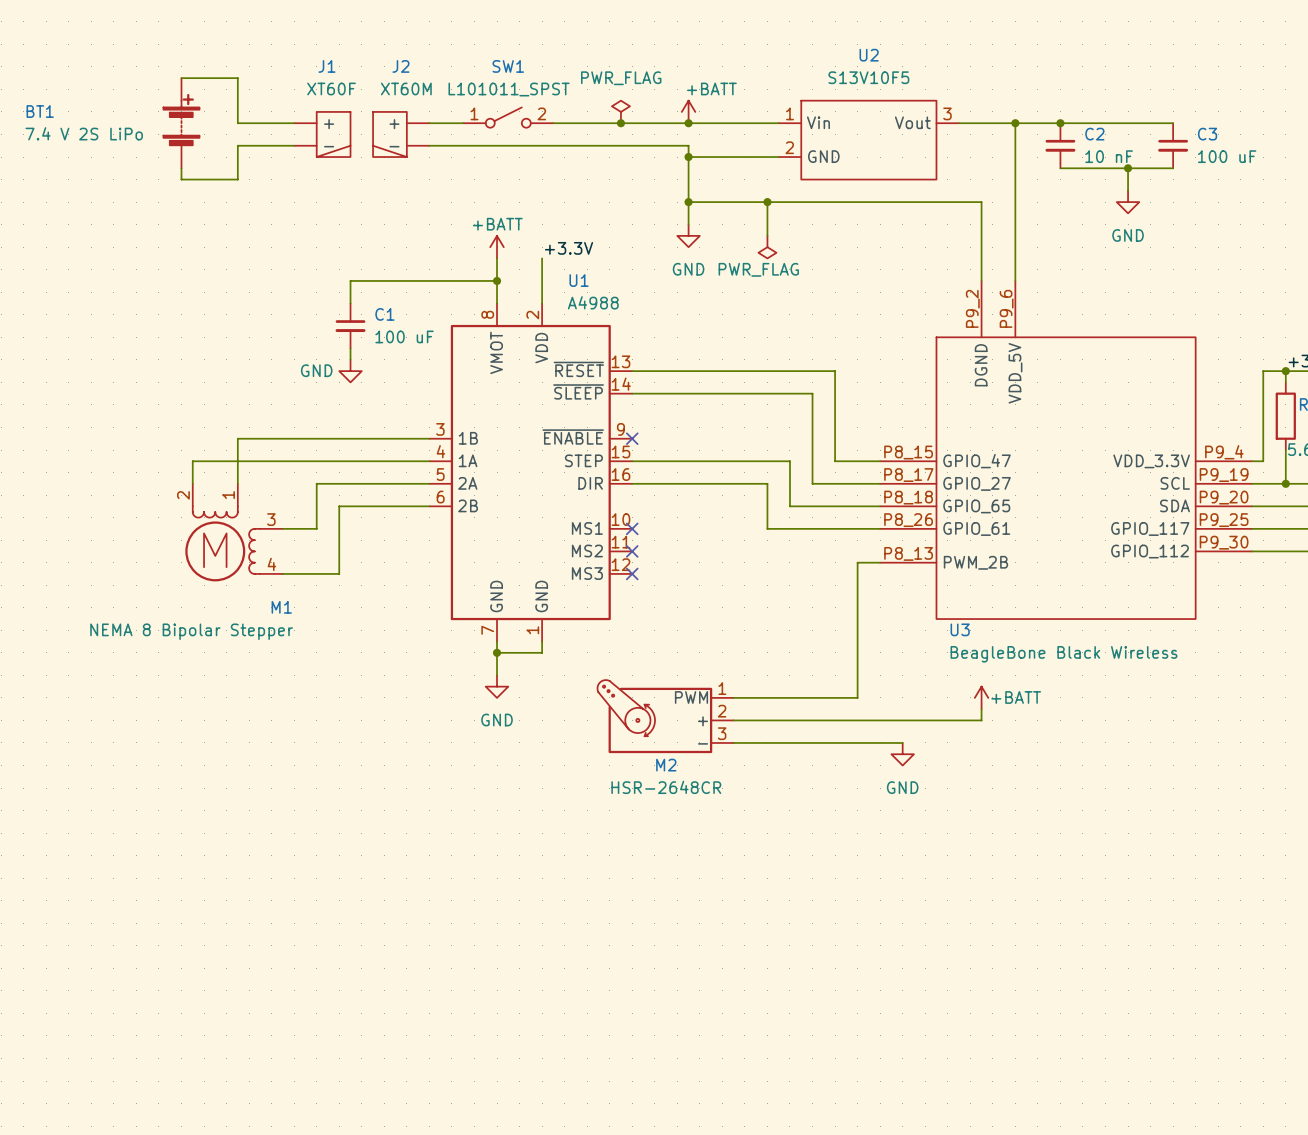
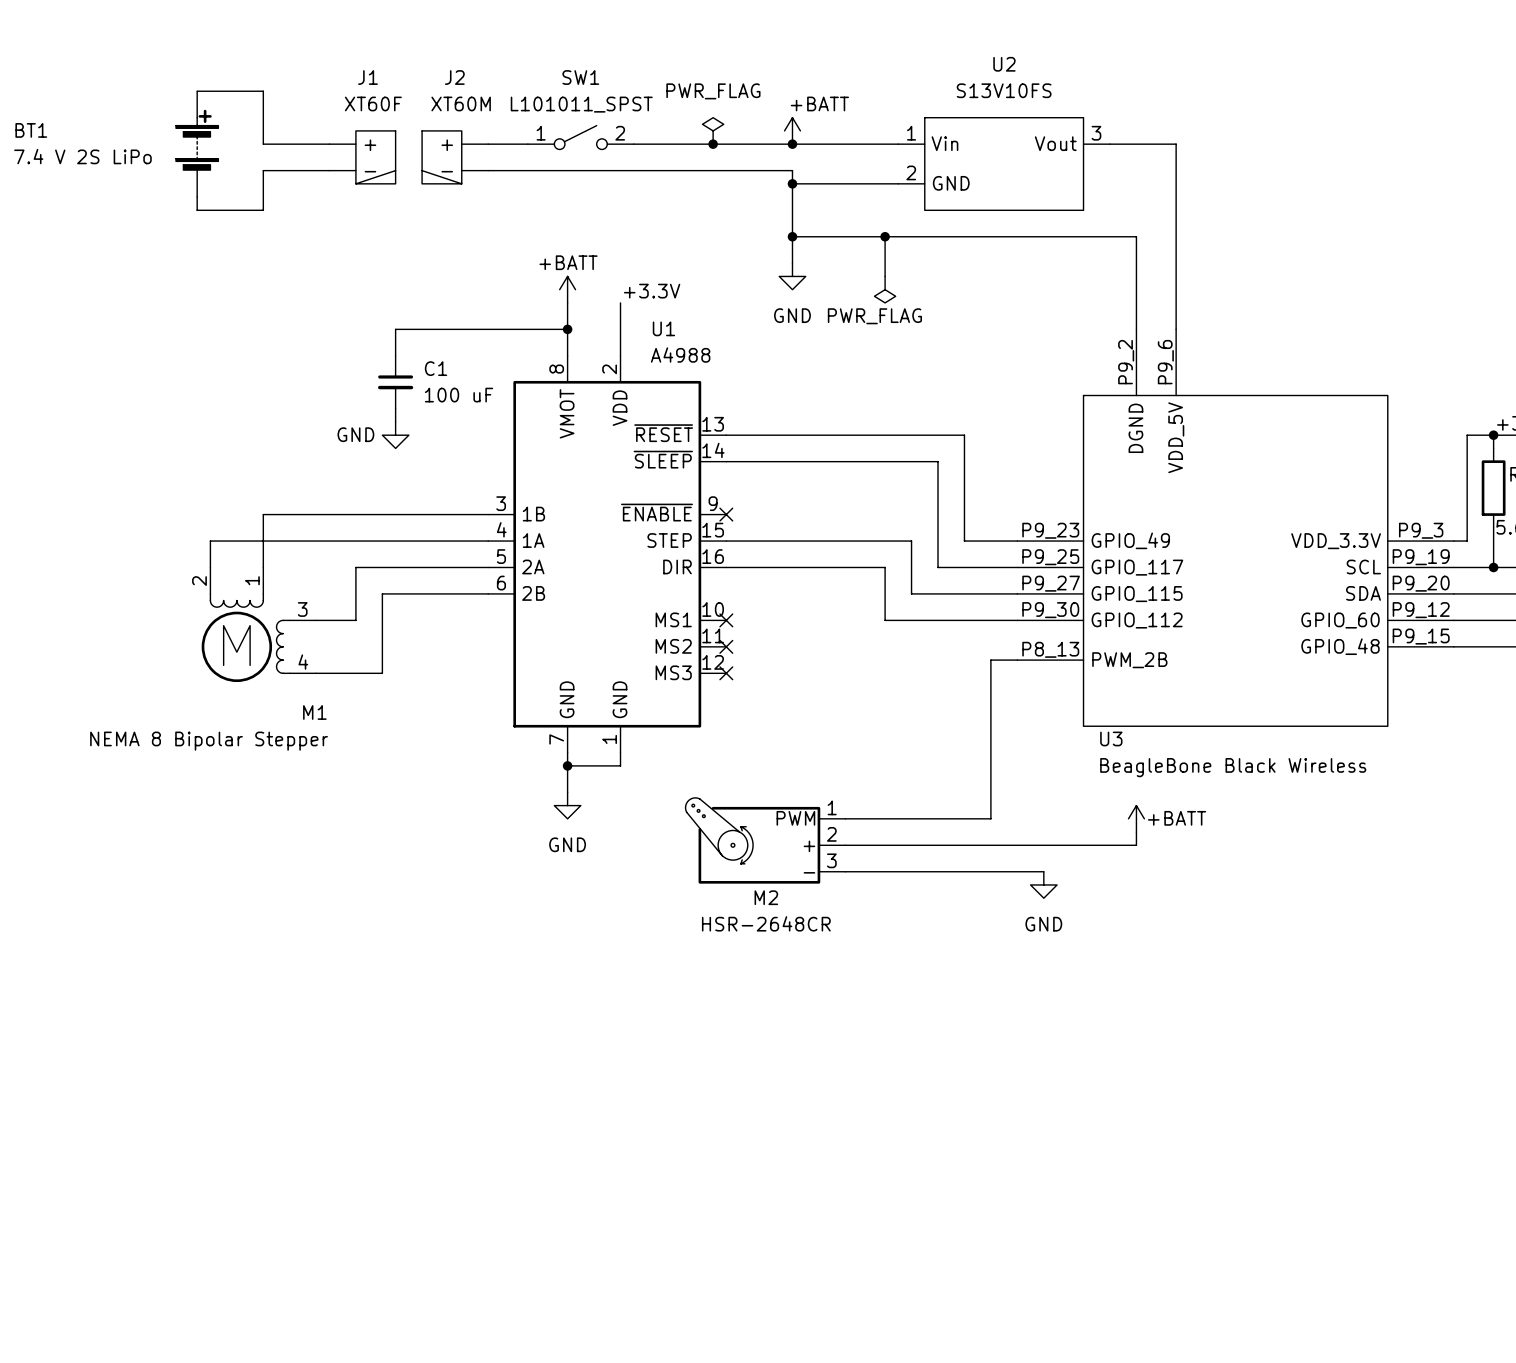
U2 value: S13V10F5 (868, 77) -> S13V10FS (1004, 90)
wire: (1015, 123) (1173, 123) -> none
junction: (1015, 123) -> none
junction: (1060, 123) -> none
C2: 10 nF (1060, 145) -> none
C3: 100 uF (1173, 145) -> none
wire: (1060, 168) (1173, 168) -> none
wire: (1128, 168) (1128, 190) -> none
junction: (1128, 168) -> none
power symbol: GND (1128, 202) -> none
U3 symbol: [880, 280, 1253, 620] -> [1017, 329, 1454, 727]

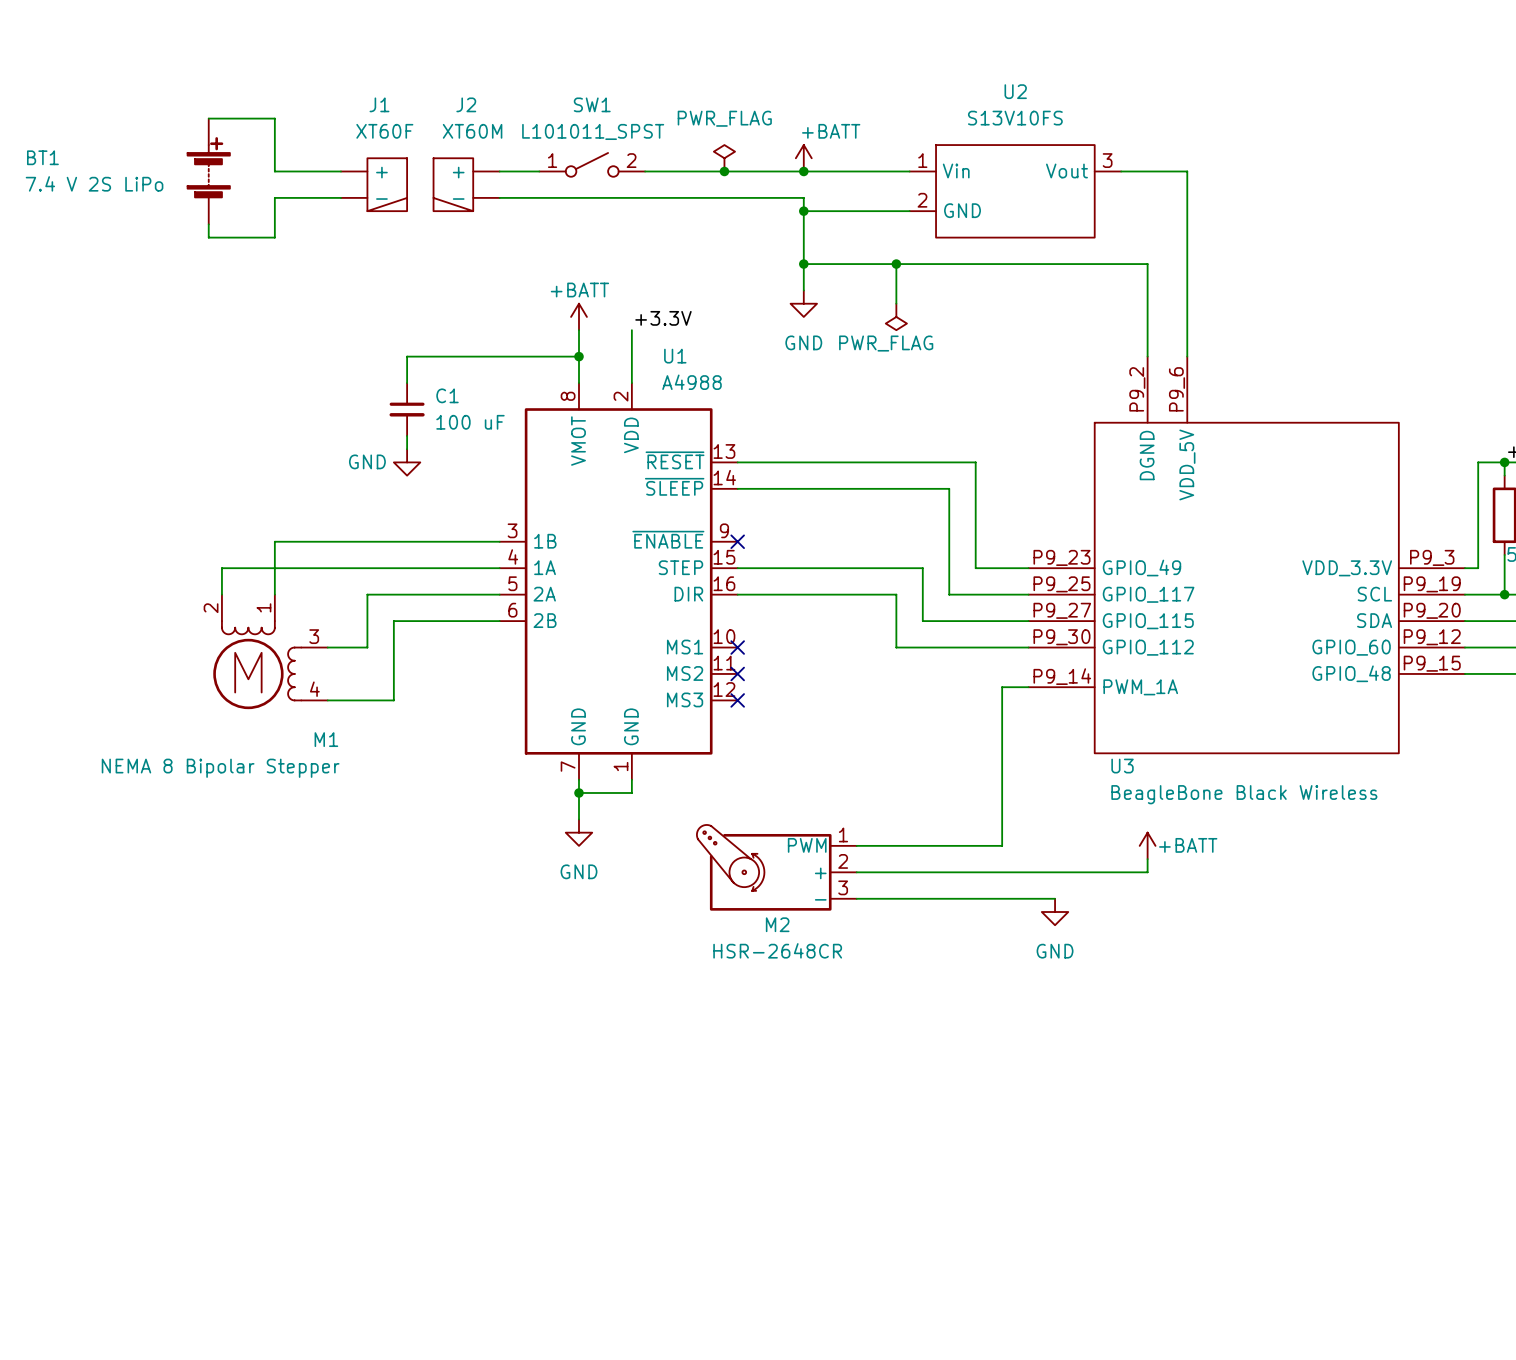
U3 pin number: P8_13 (1050, 649) -> P9_14 (1062, 676)
U3 pin name: PWM_2B (1129, 660) -> PWM_1A (1140, 687)

